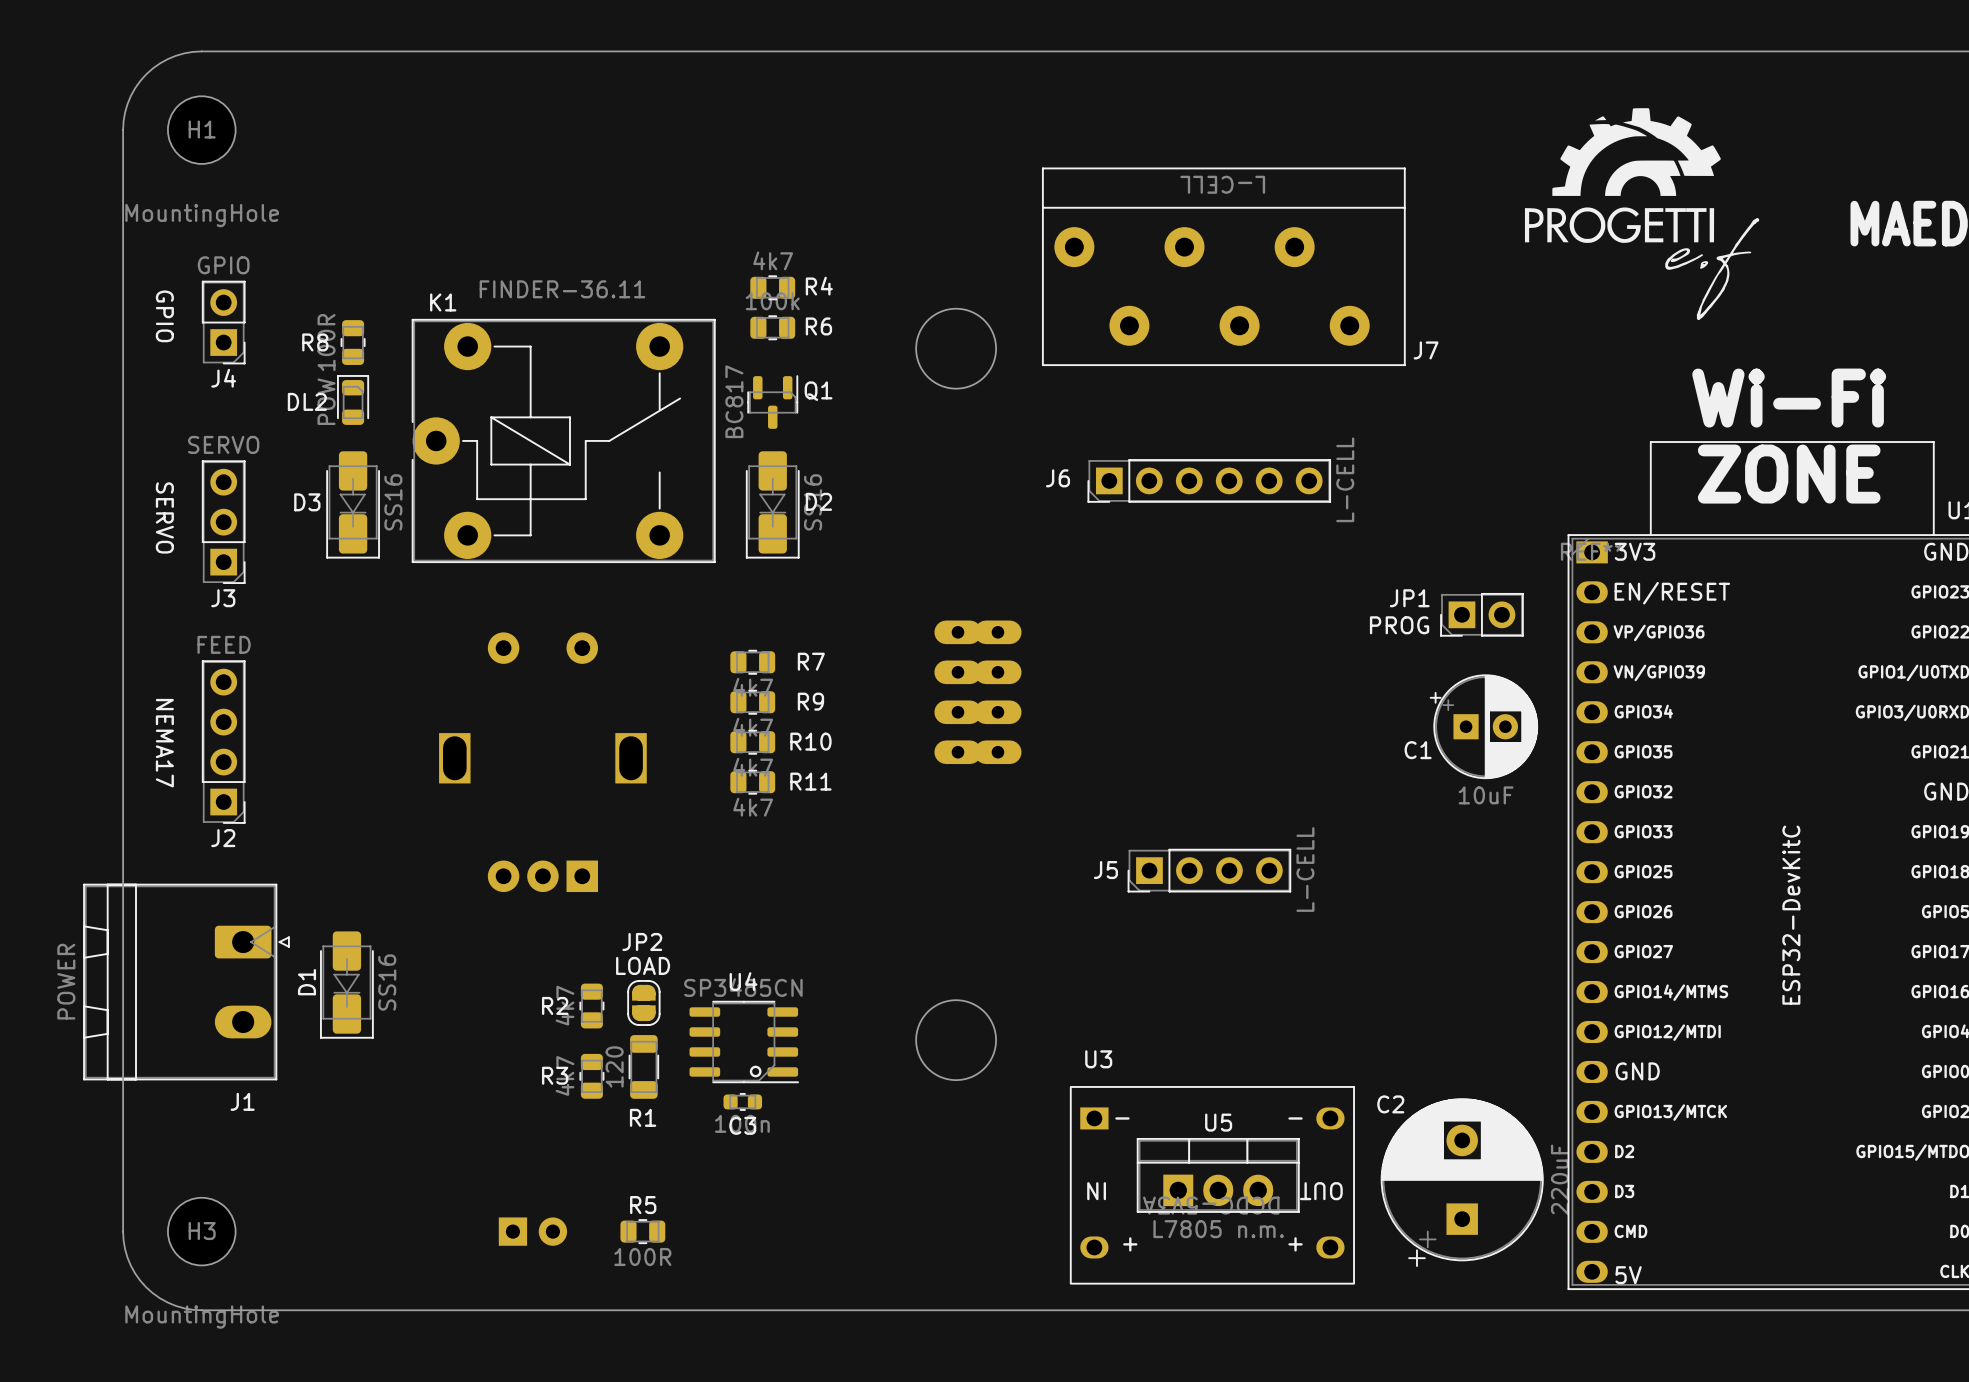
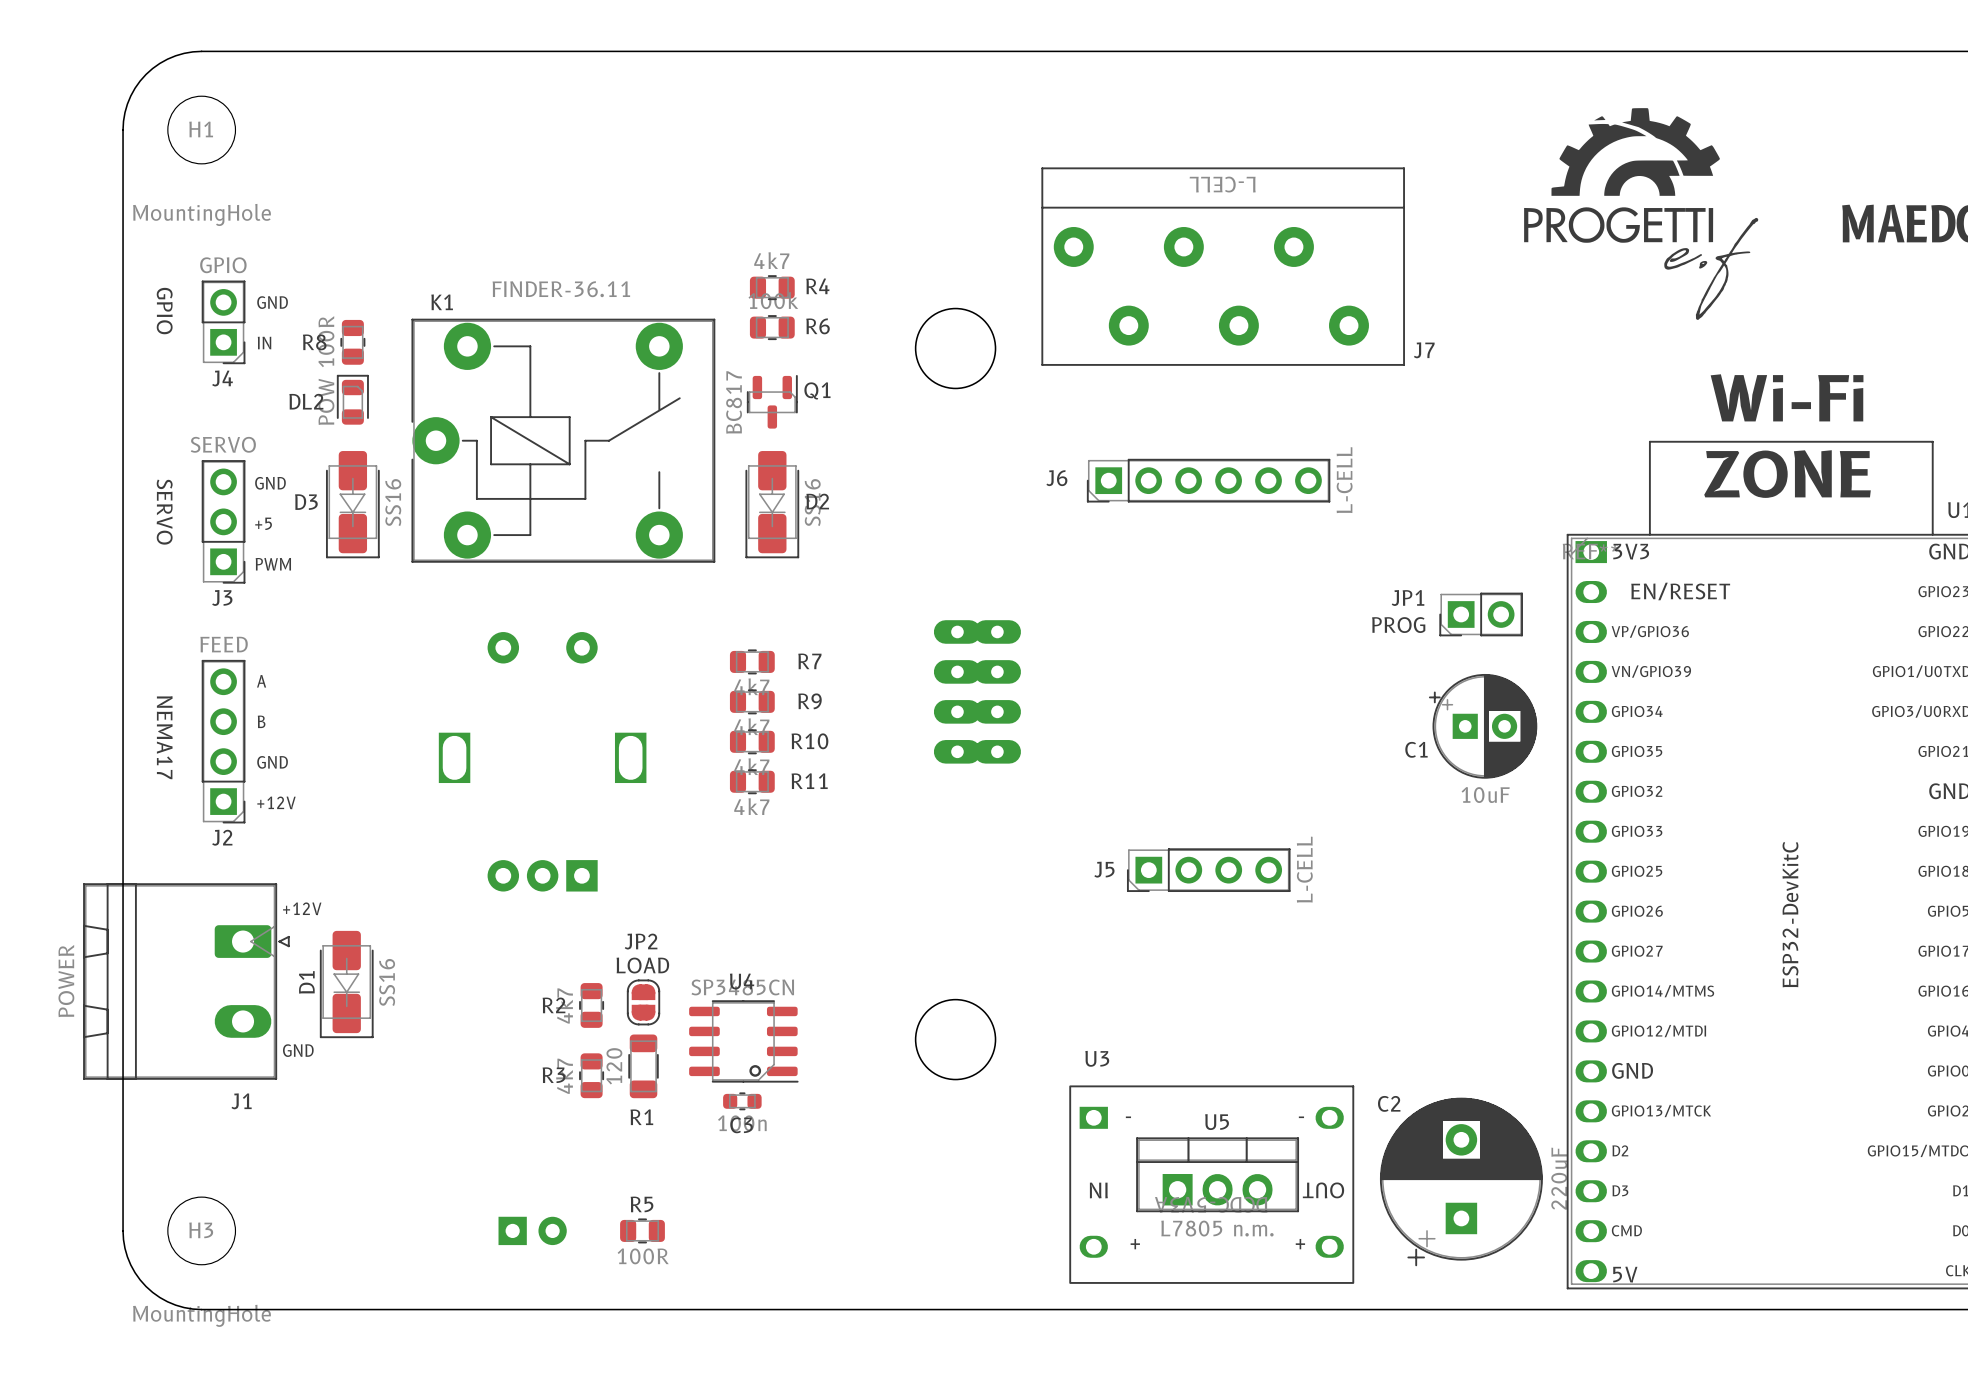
text: none -> GND (272, 302)
text: none -> IN (264, 343)
text: none -> GND (270, 483)
text: none -> +5 (263, 523)
text: none -> PWM (273, 564)
text: none -> A (261, 681)
text: none -> B (261, 721)
text: none -> GND (272, 762)
text: none -> +12V (276, 802)
text: none -> +12V (302, 908)
text: none -> GND (298, 1050)

